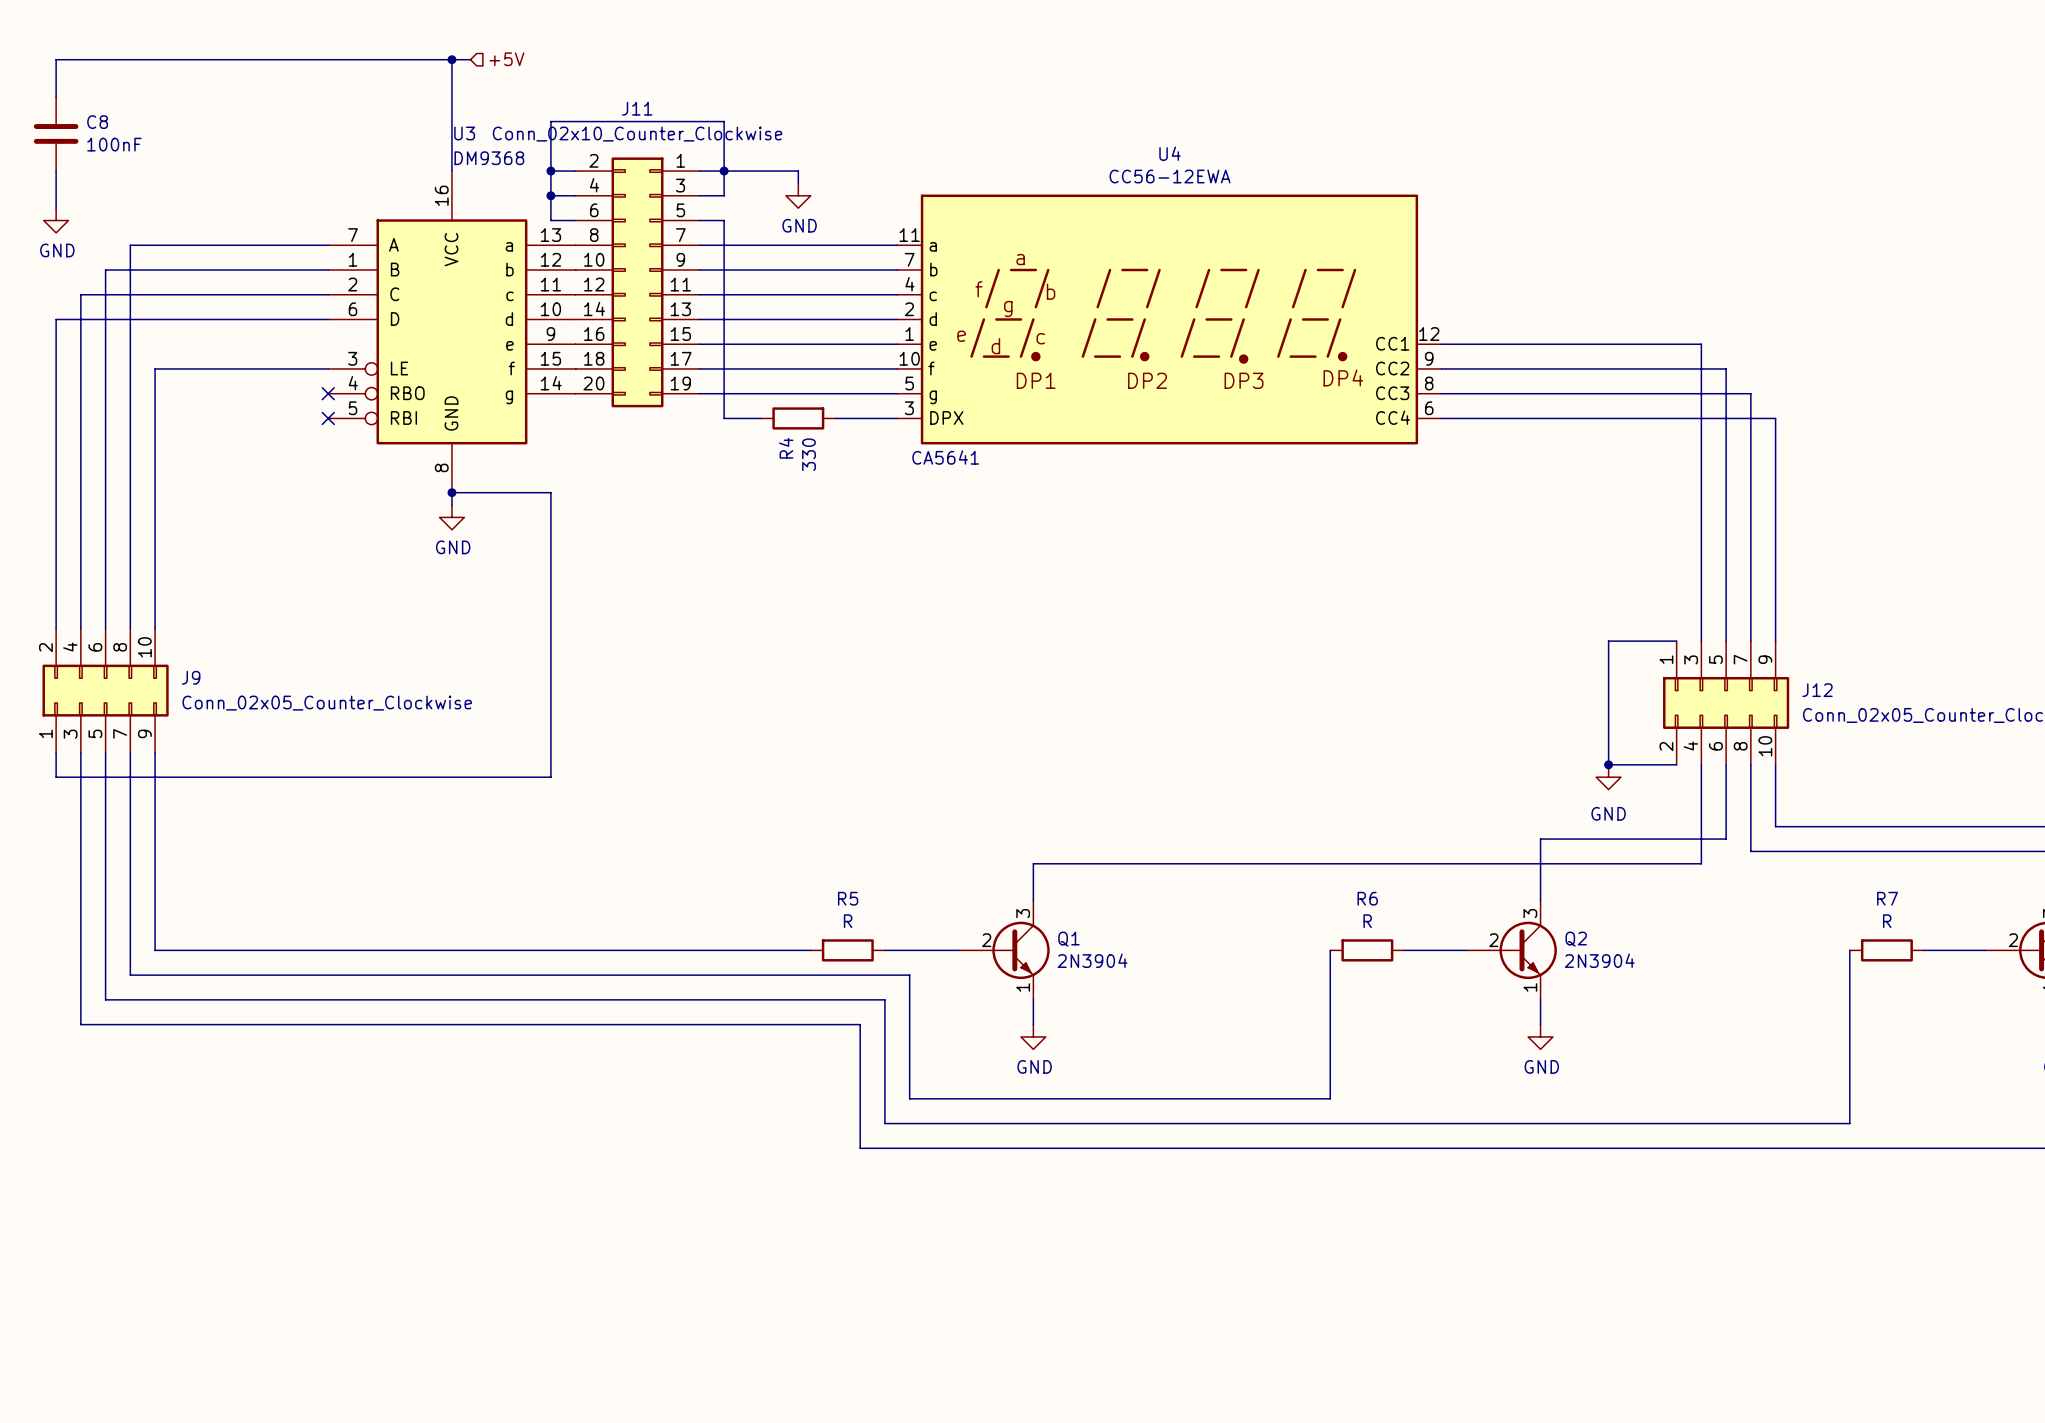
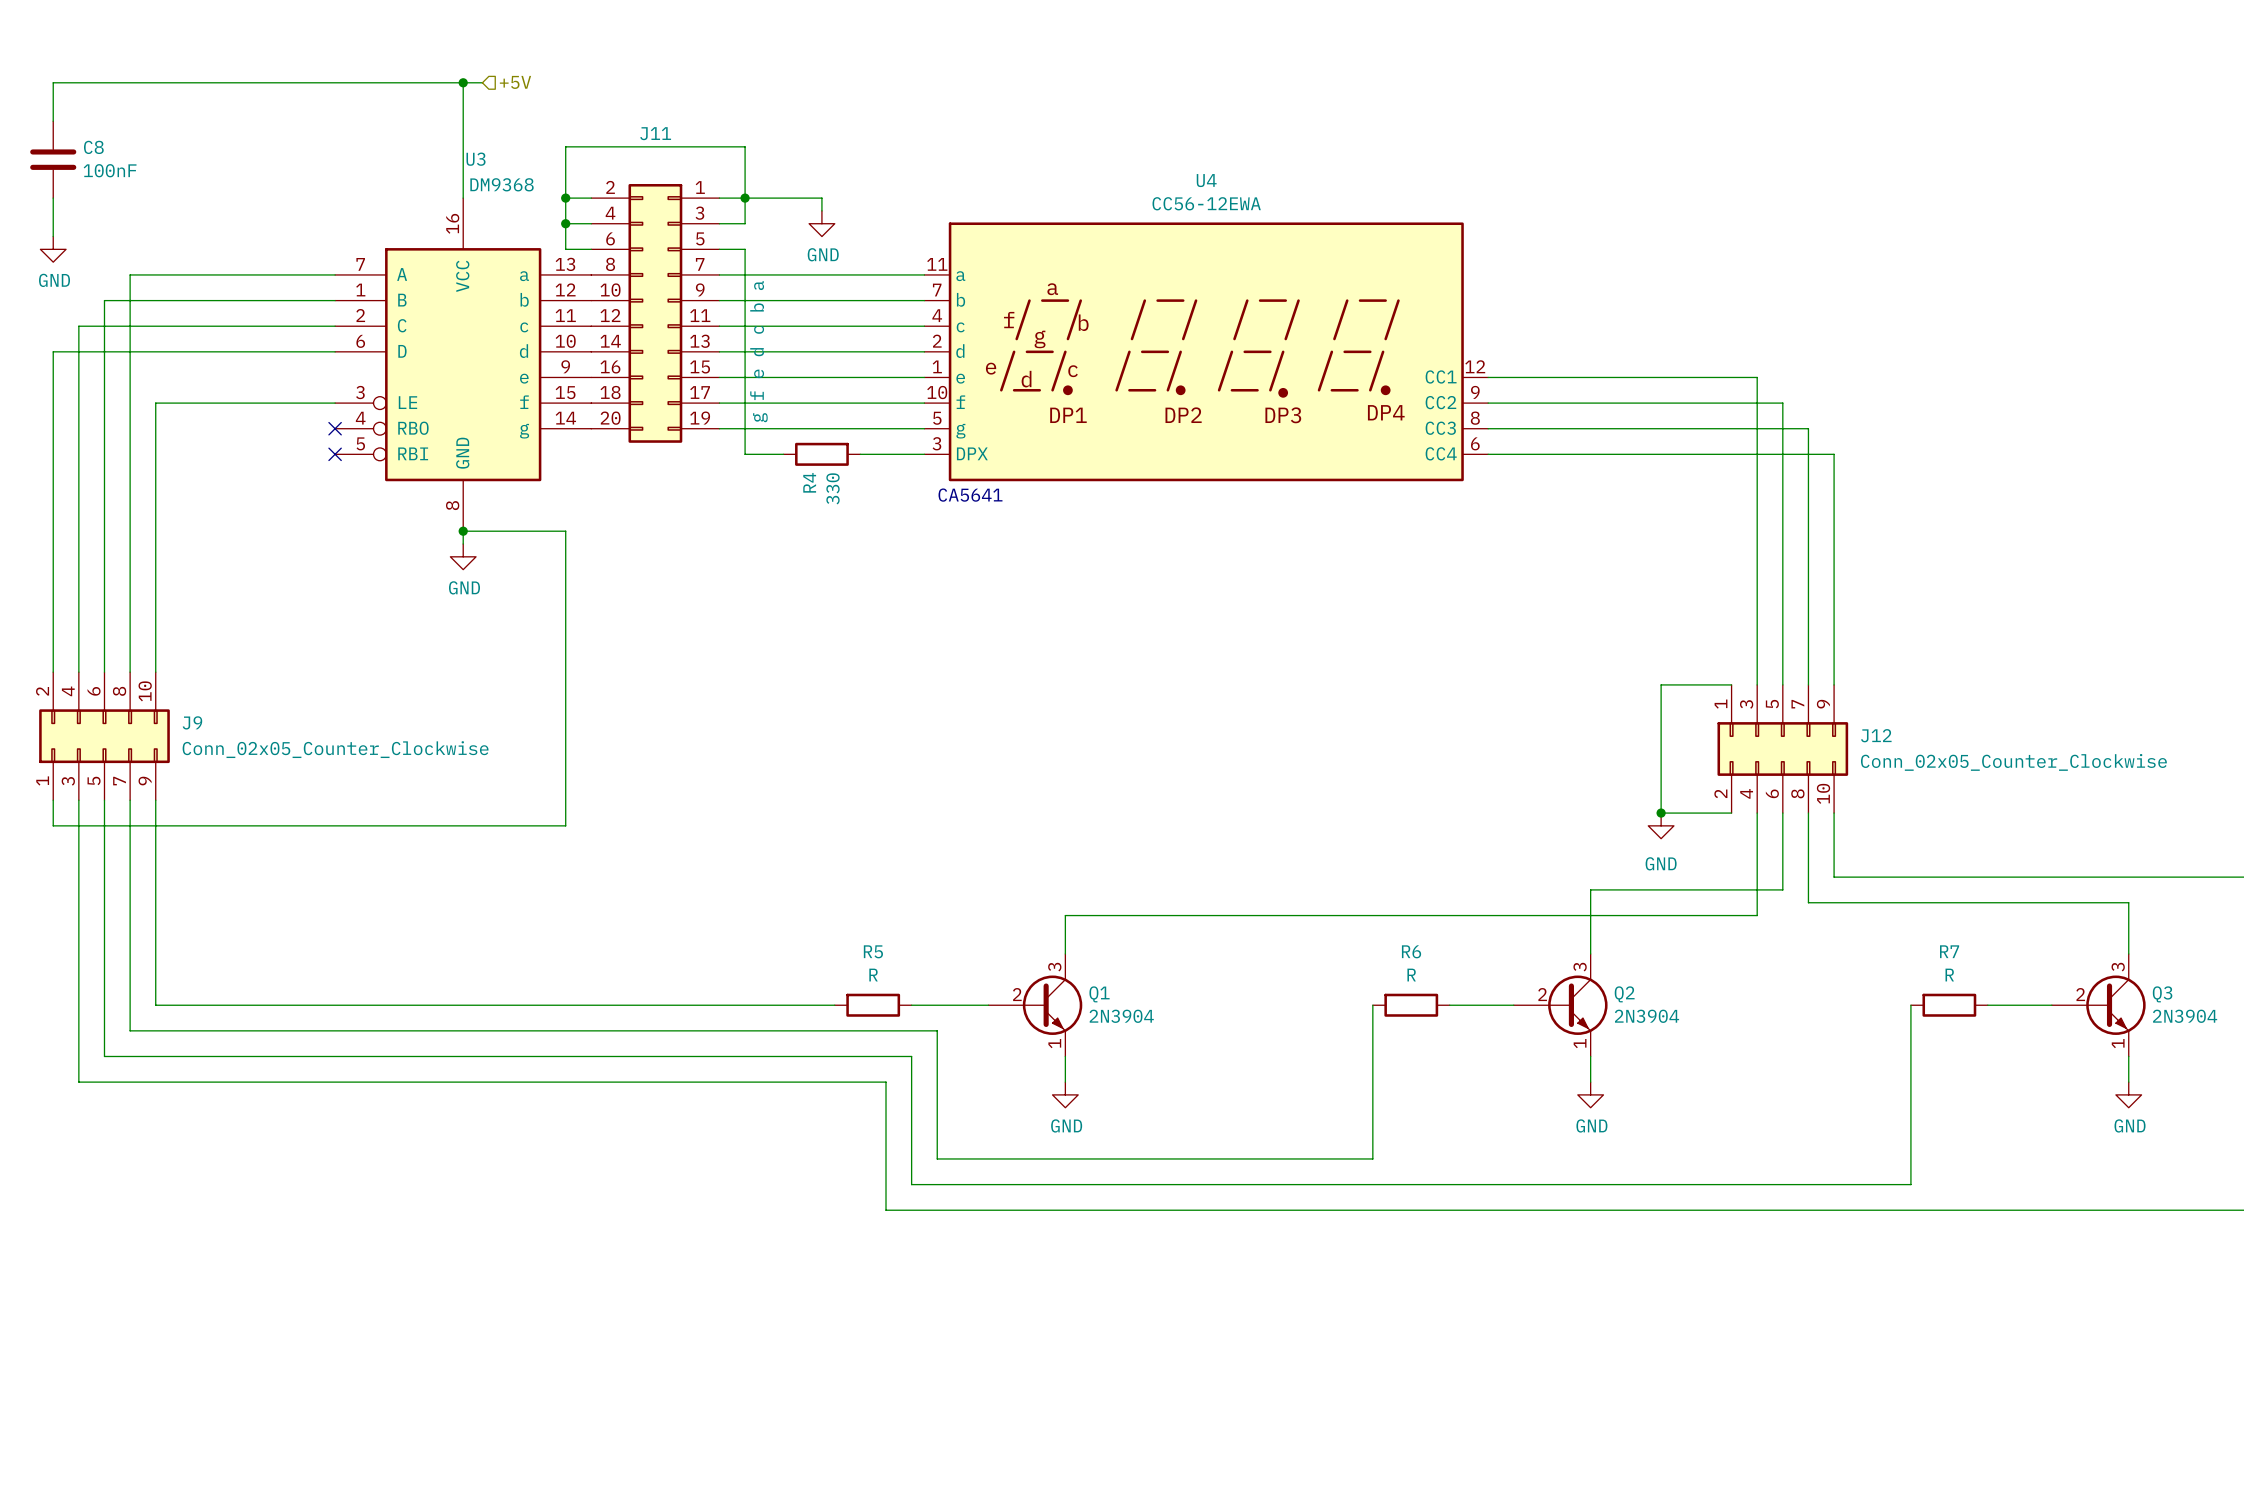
J11 value: Conn_02x10_Counter_Clockwise (637, 134) -> g f e d c b a (758, 351)

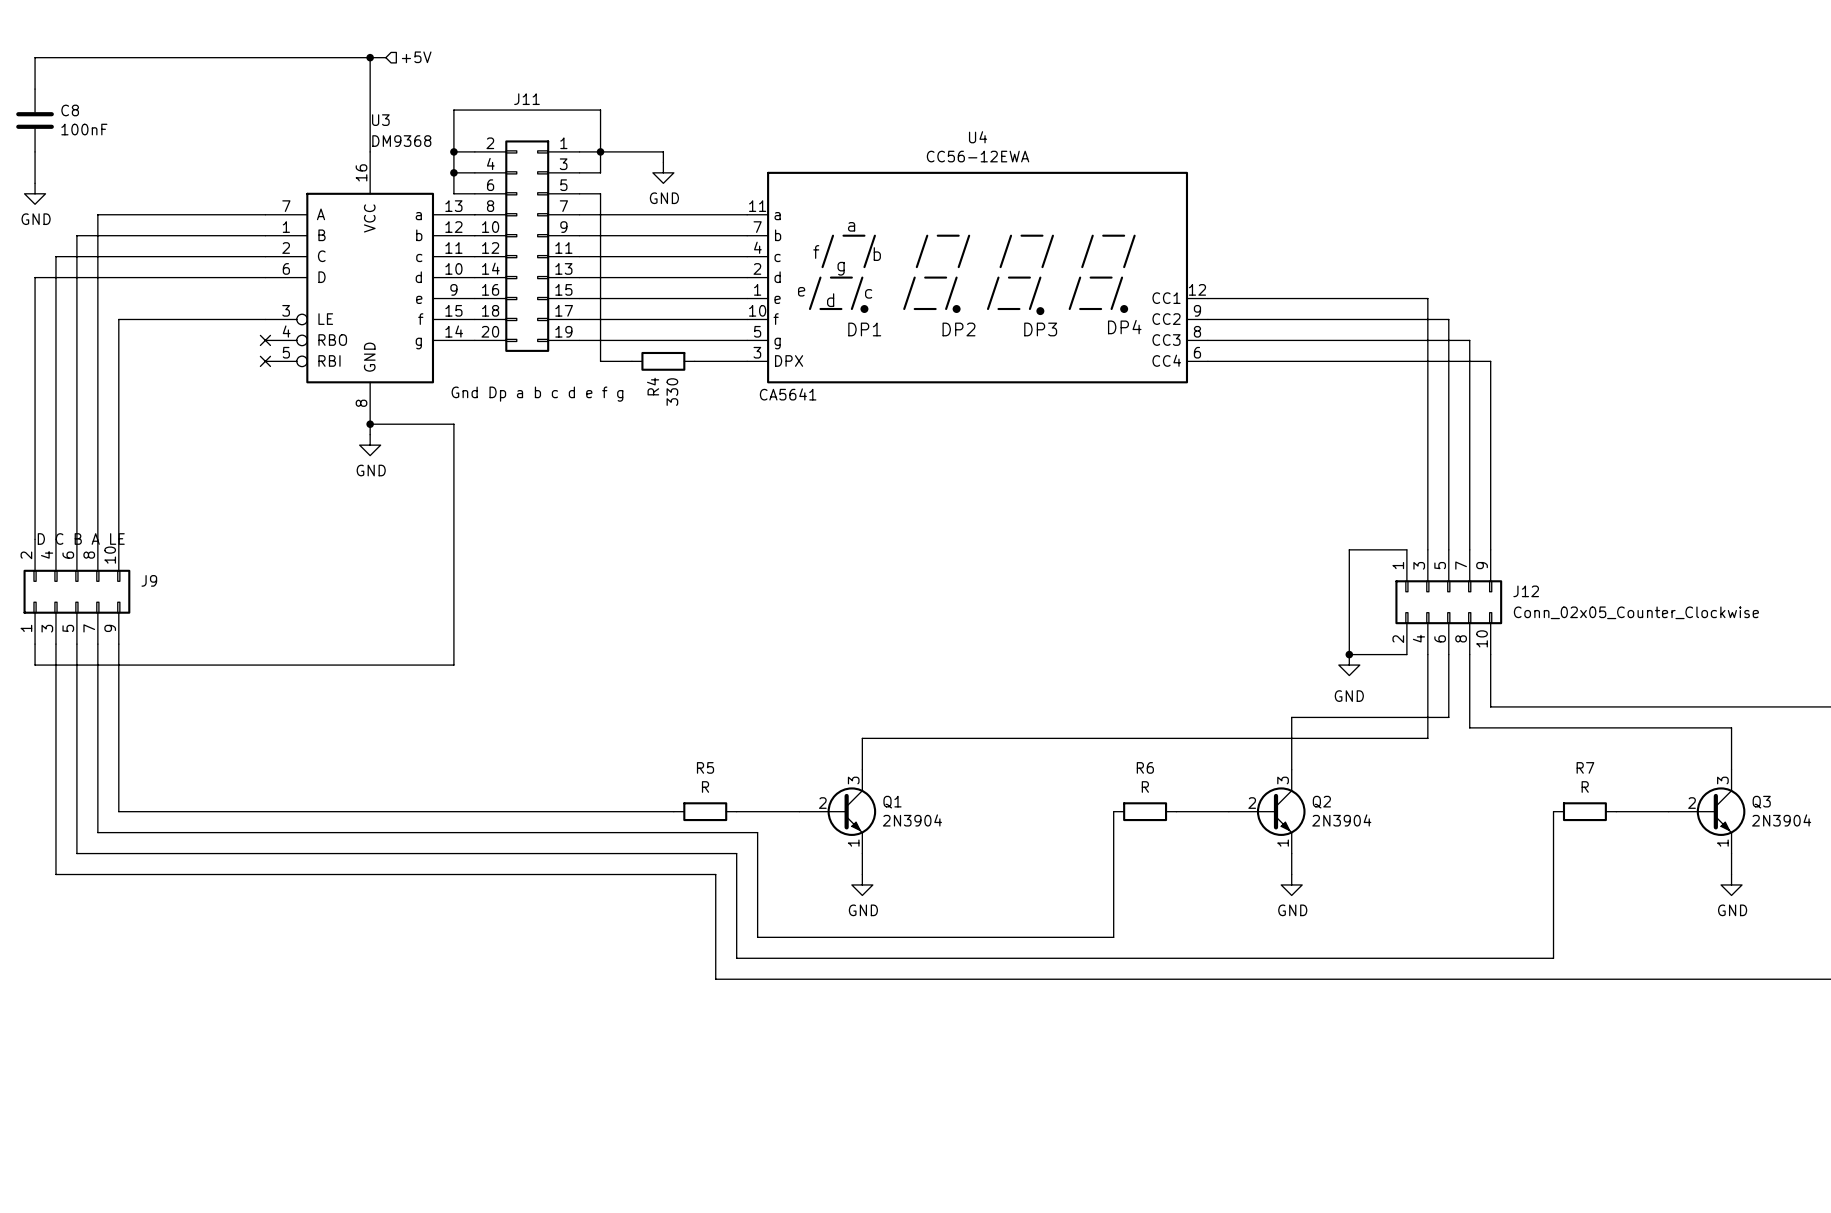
J11 value: g f e d c b a (758, 351) -> Gnd Dp a b c d e f g (537, 394)
J9 value: Conn_02x05_Counter_Clockwise (335, 749) -> D C B A LE (81, 539)

